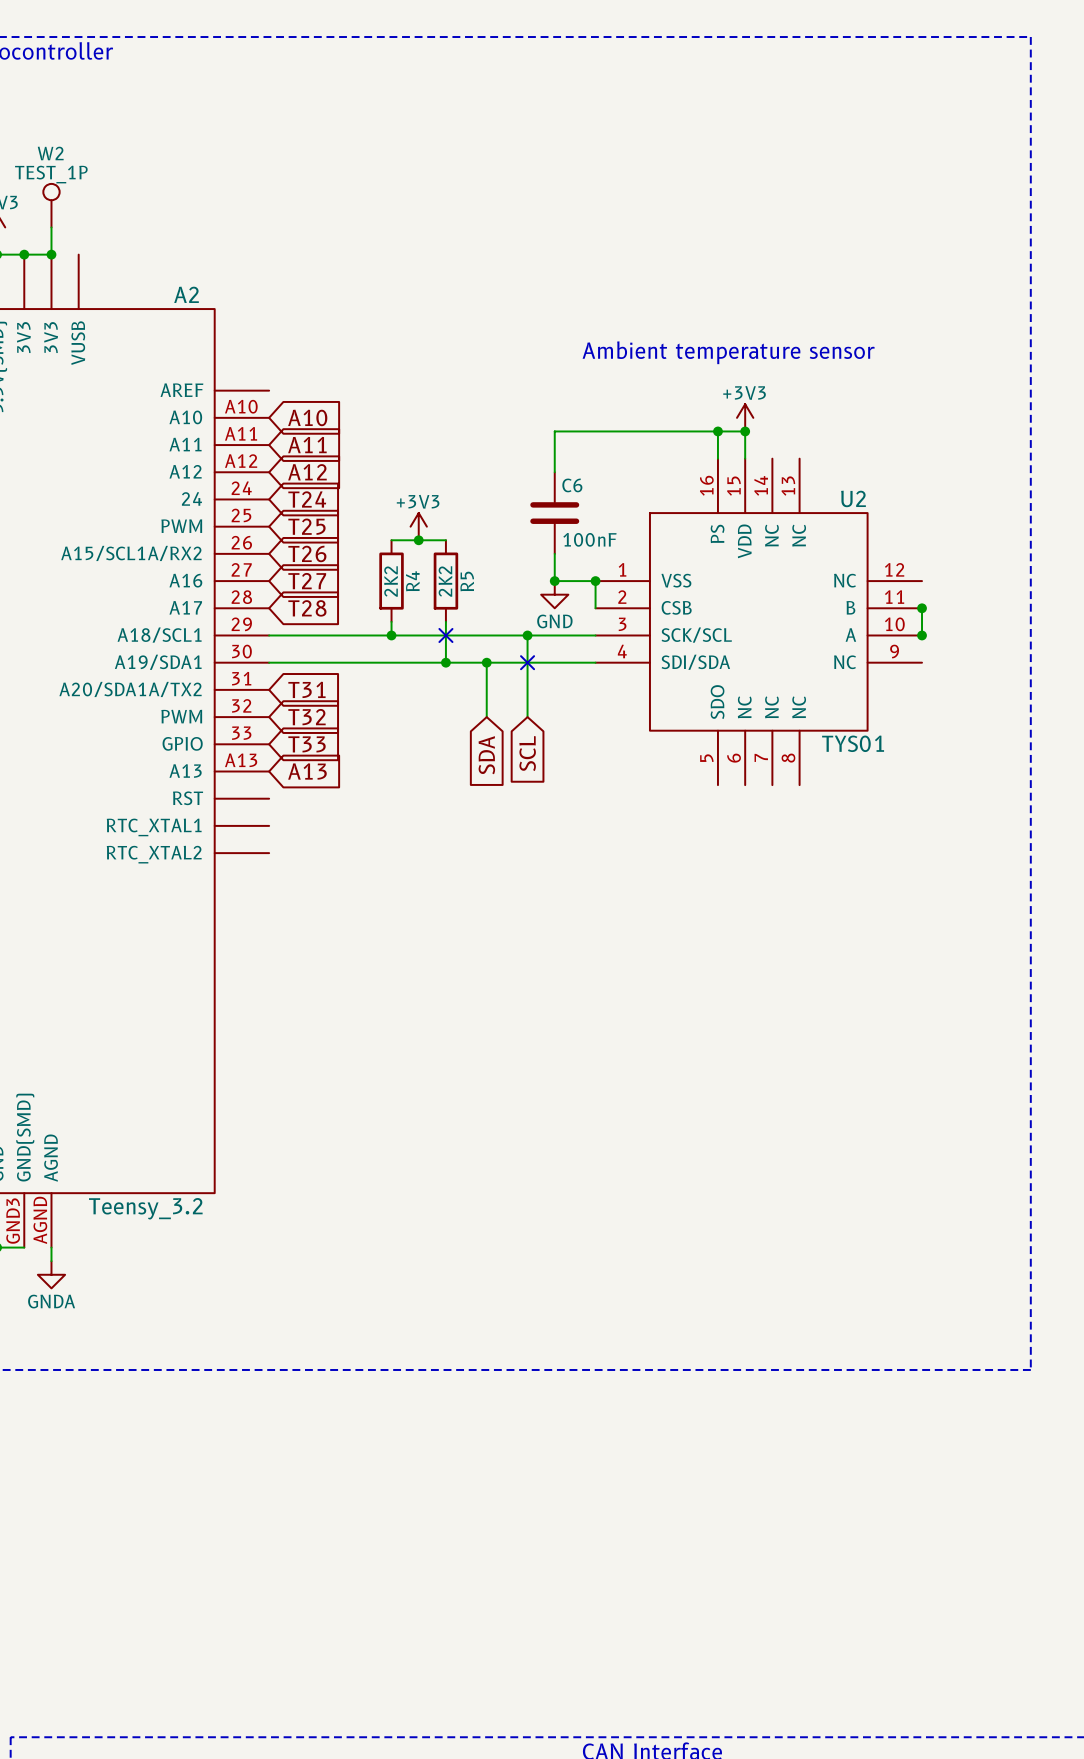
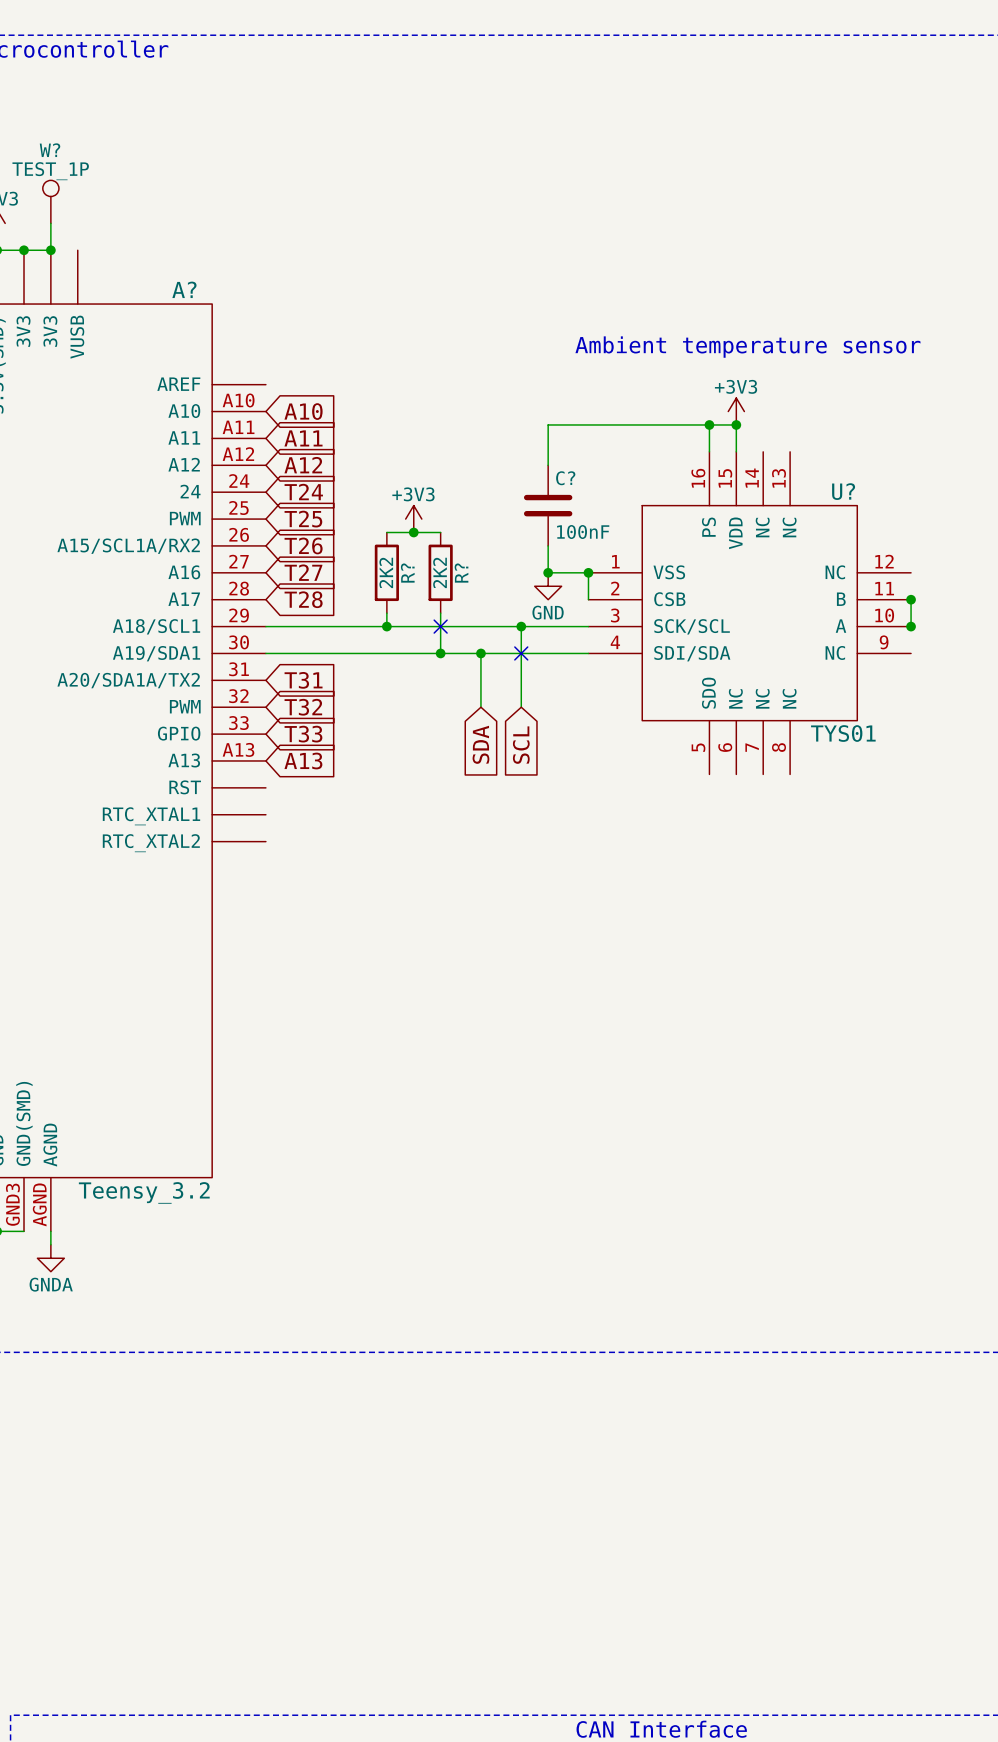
W2 name: W2 (50, 153) -> W? (50, 150)
A2 name: A2 (186, 294) -> A? (184, 289)
C6 name: C6 (572, 485) -> C? (565, 478)
U2 name: U2 (853, 498) -> U? (843, 491)
R4 name: R4 (412, 581) -> R? (407, 573)
R5 name: R5 (467, 581) -> R? (461, 573)

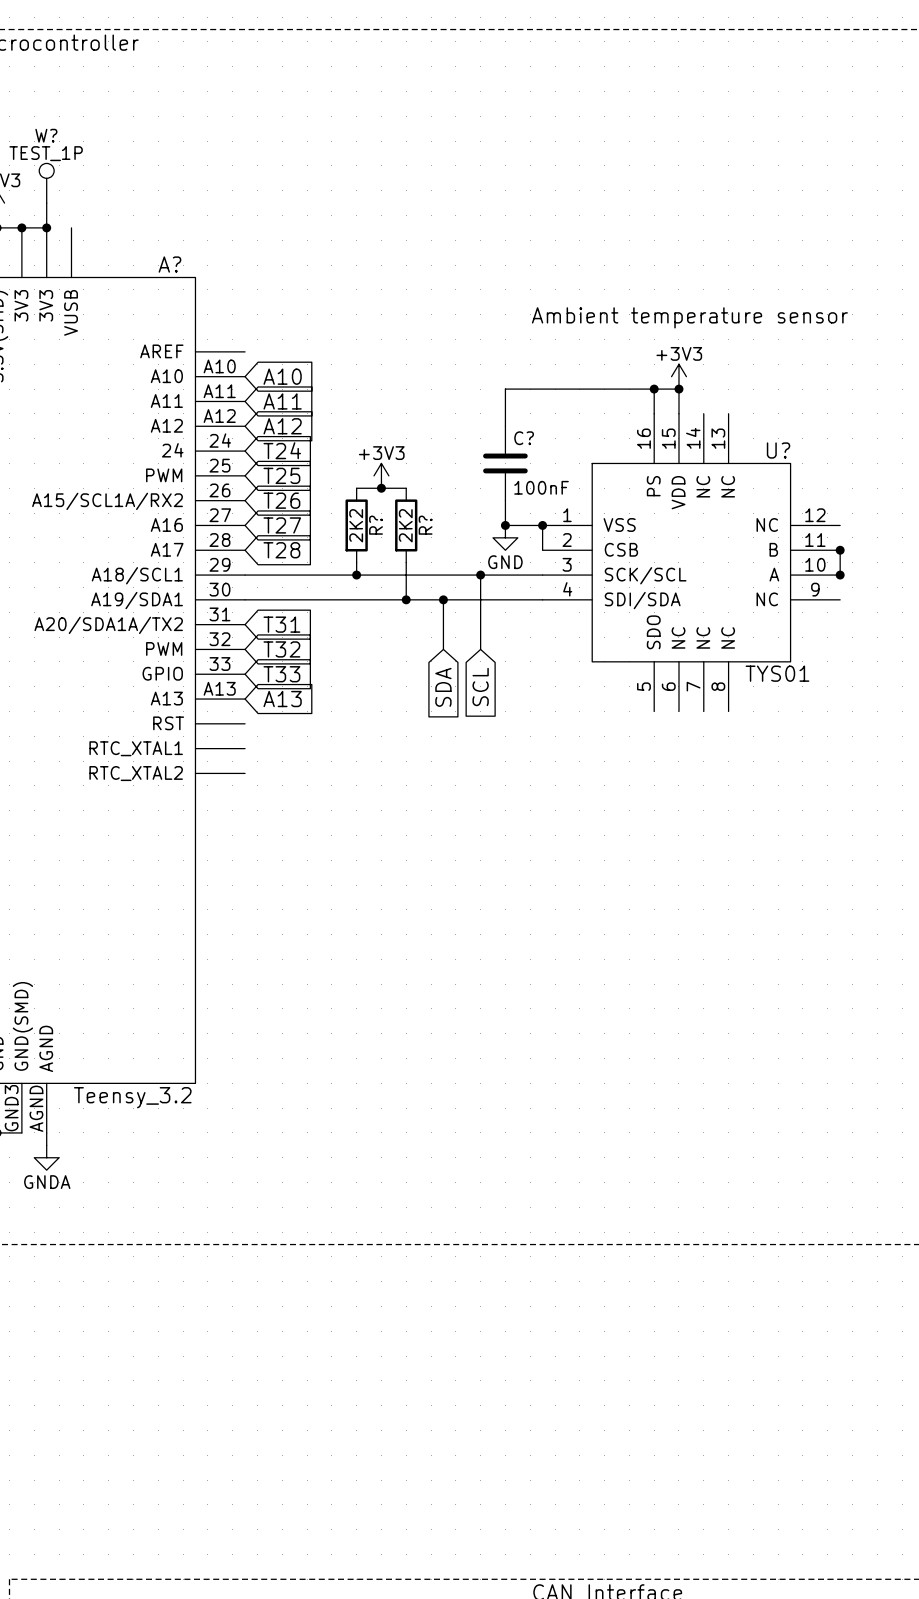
no-connect mark: (440, 626) -> none
no-connect mark: (521, 653) -> none

